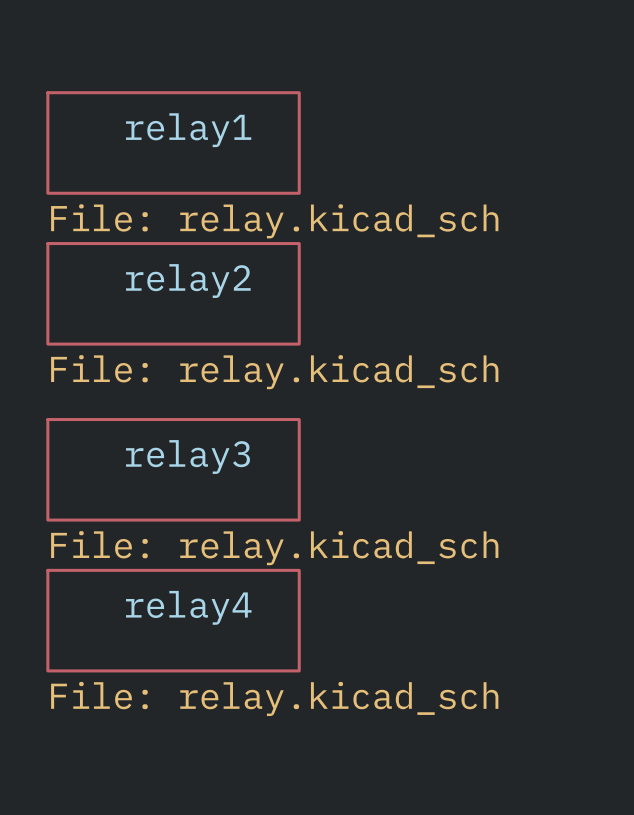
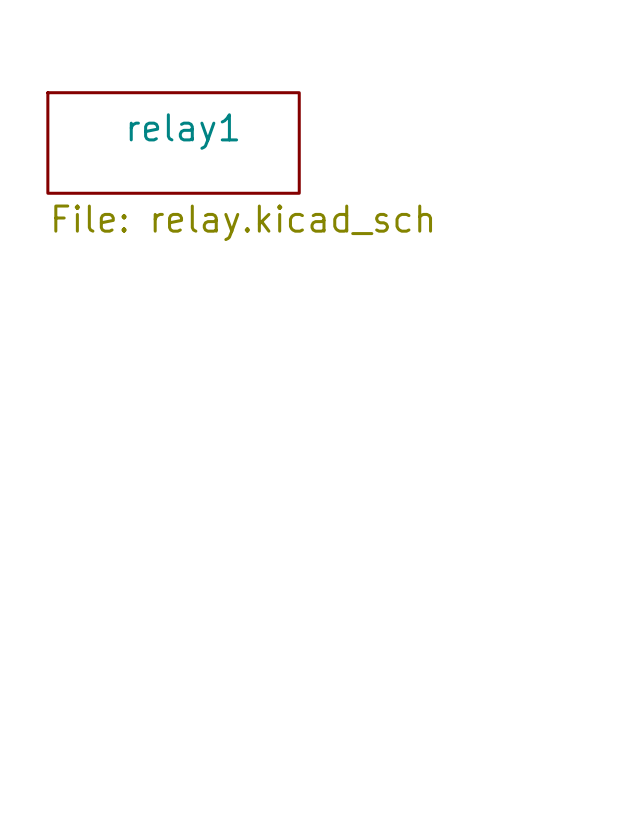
sheet relay2: File: relay.kicad_sch (173, 293) -> none
sheet relay3: File: relay.kicad_sch (173, 469) -> none
sheet relay4: File: relay.kicad_sch (173, 620) -> none

